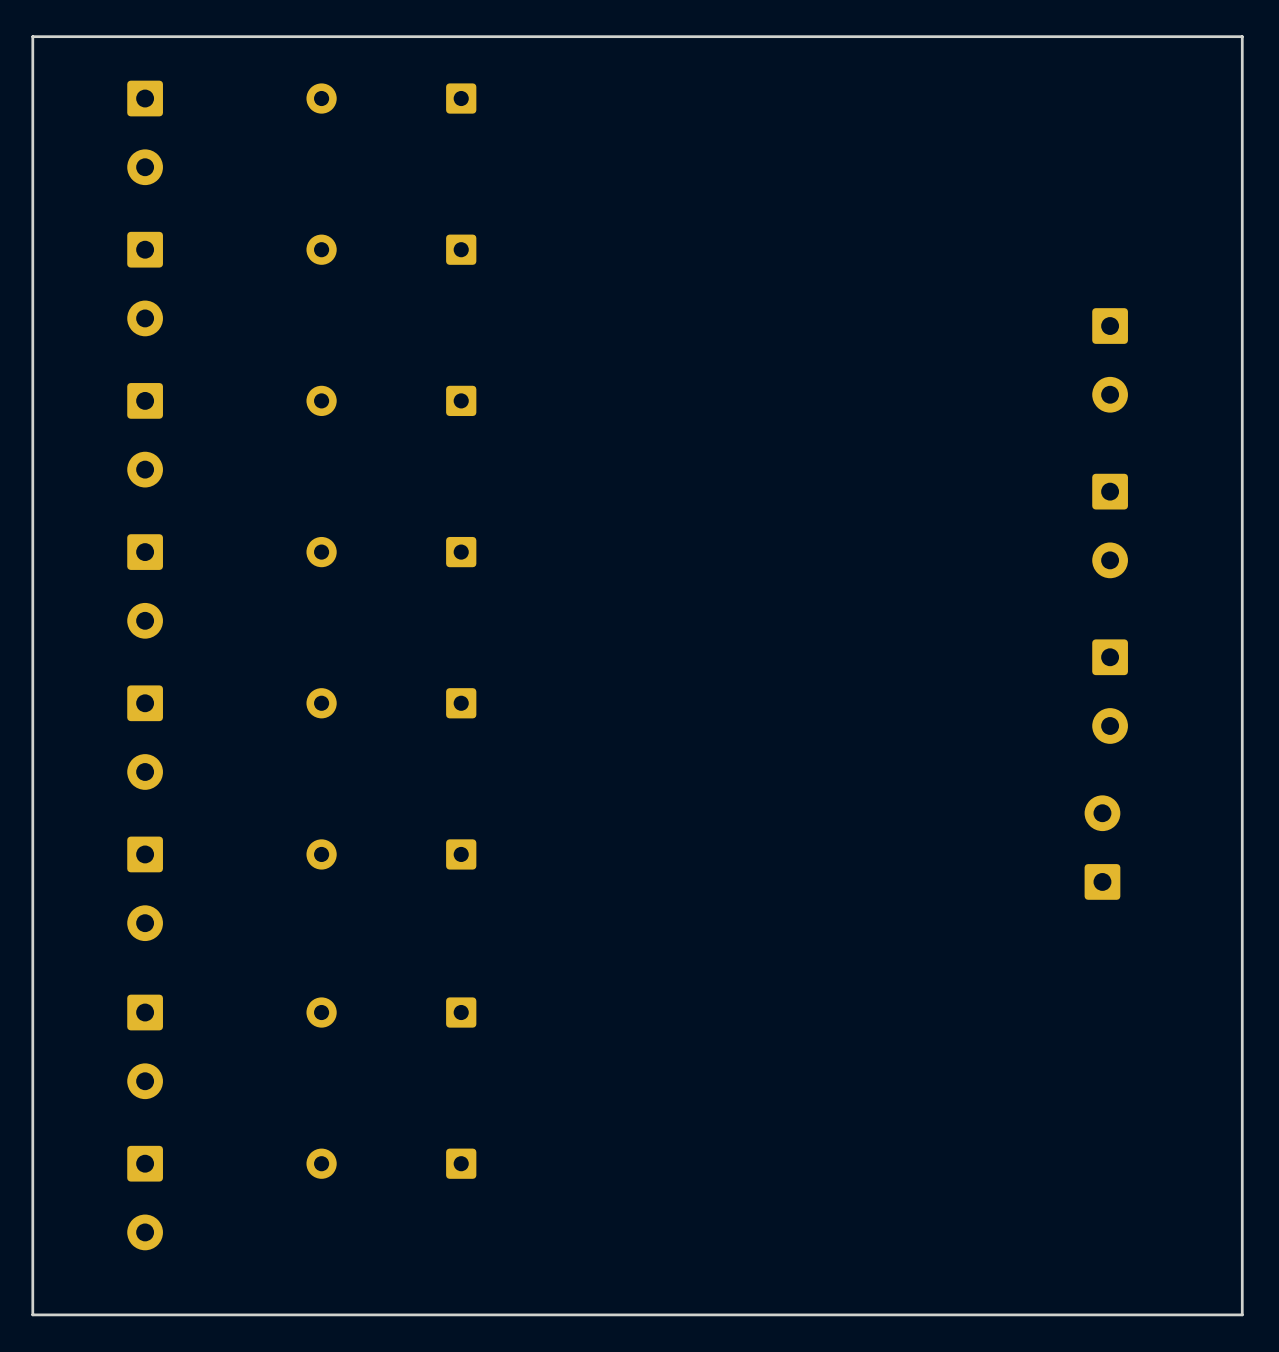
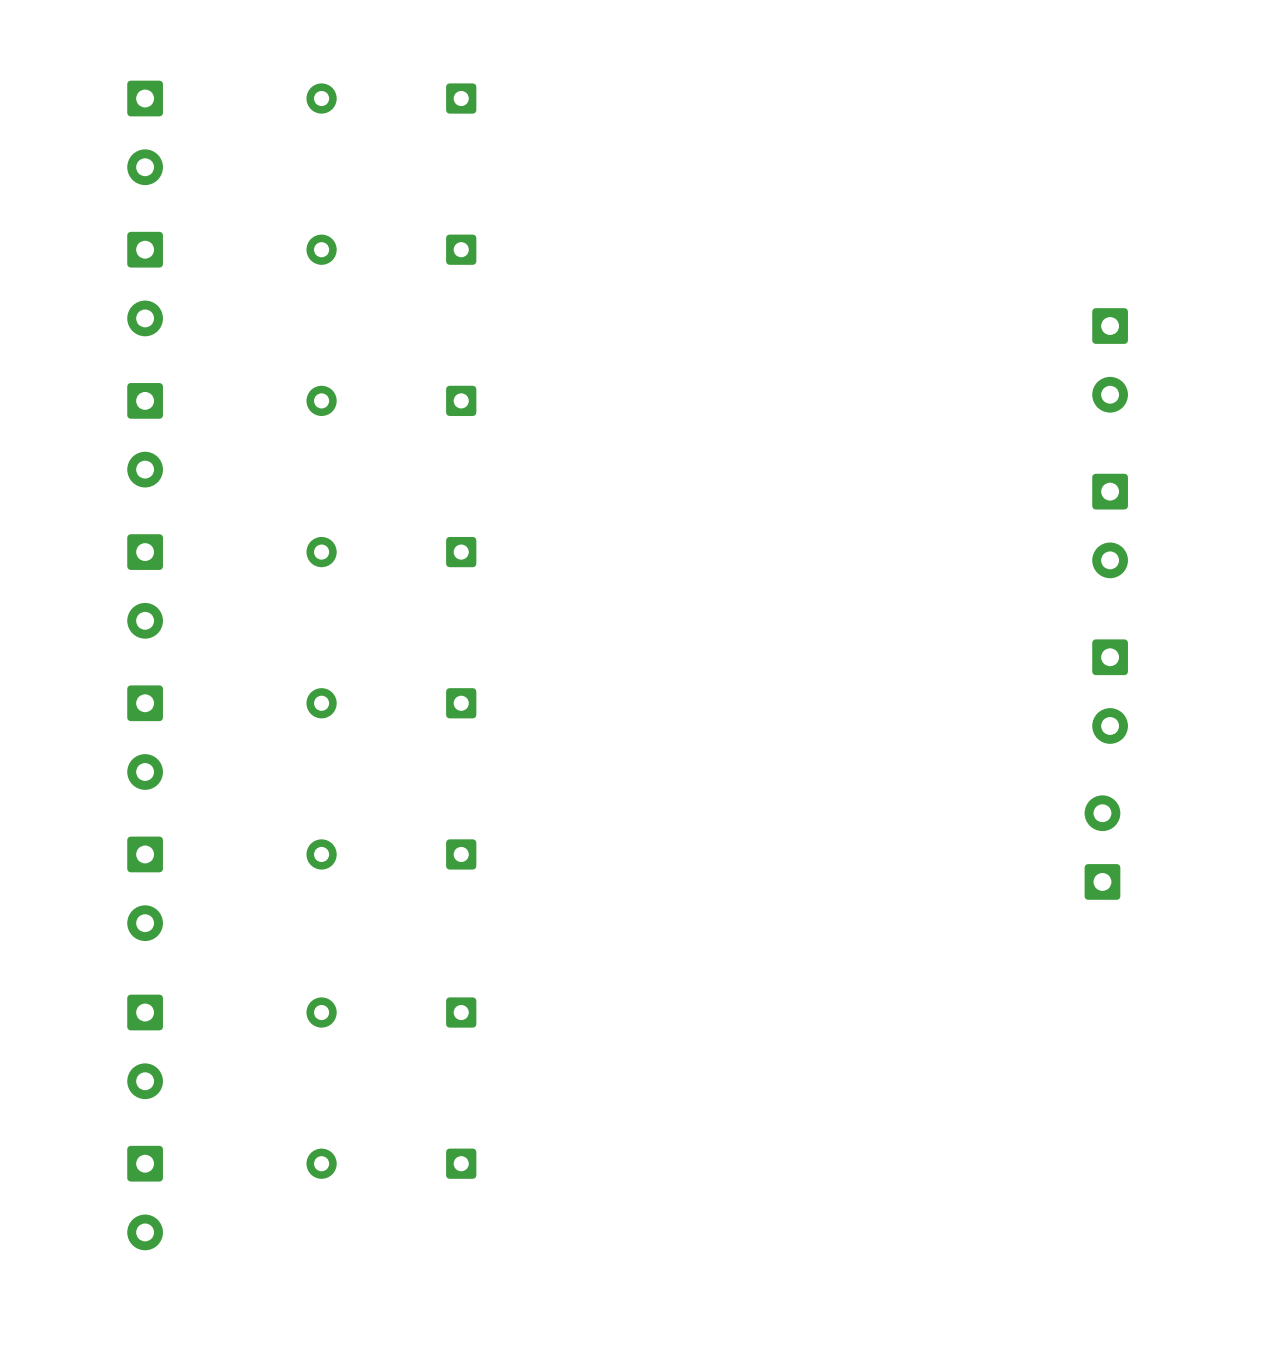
board edge: (1242, 36) (32, 36) (32, 1314) (1242, 1314) (1242, 36) -> none

